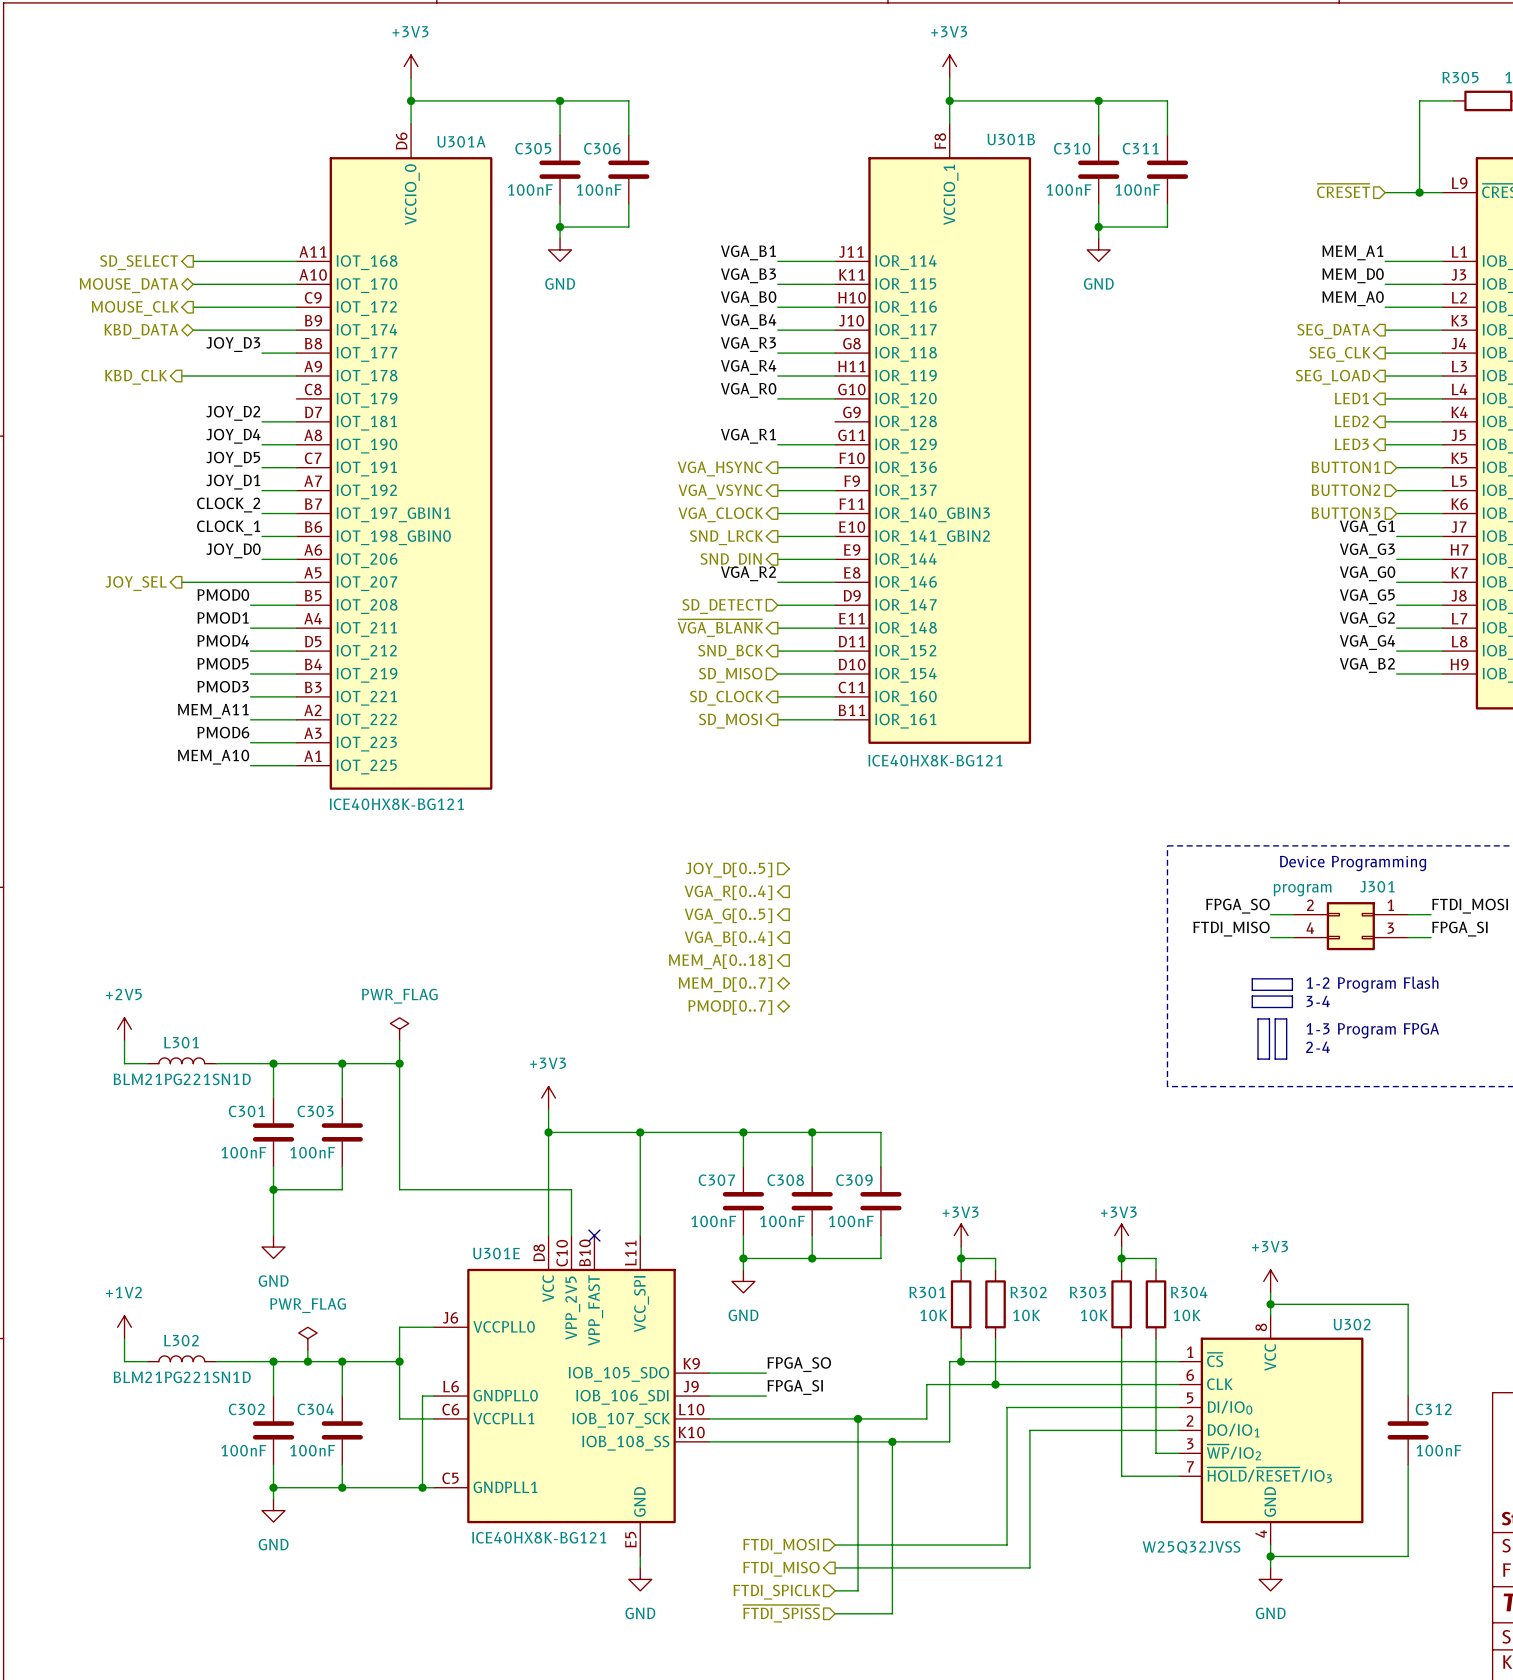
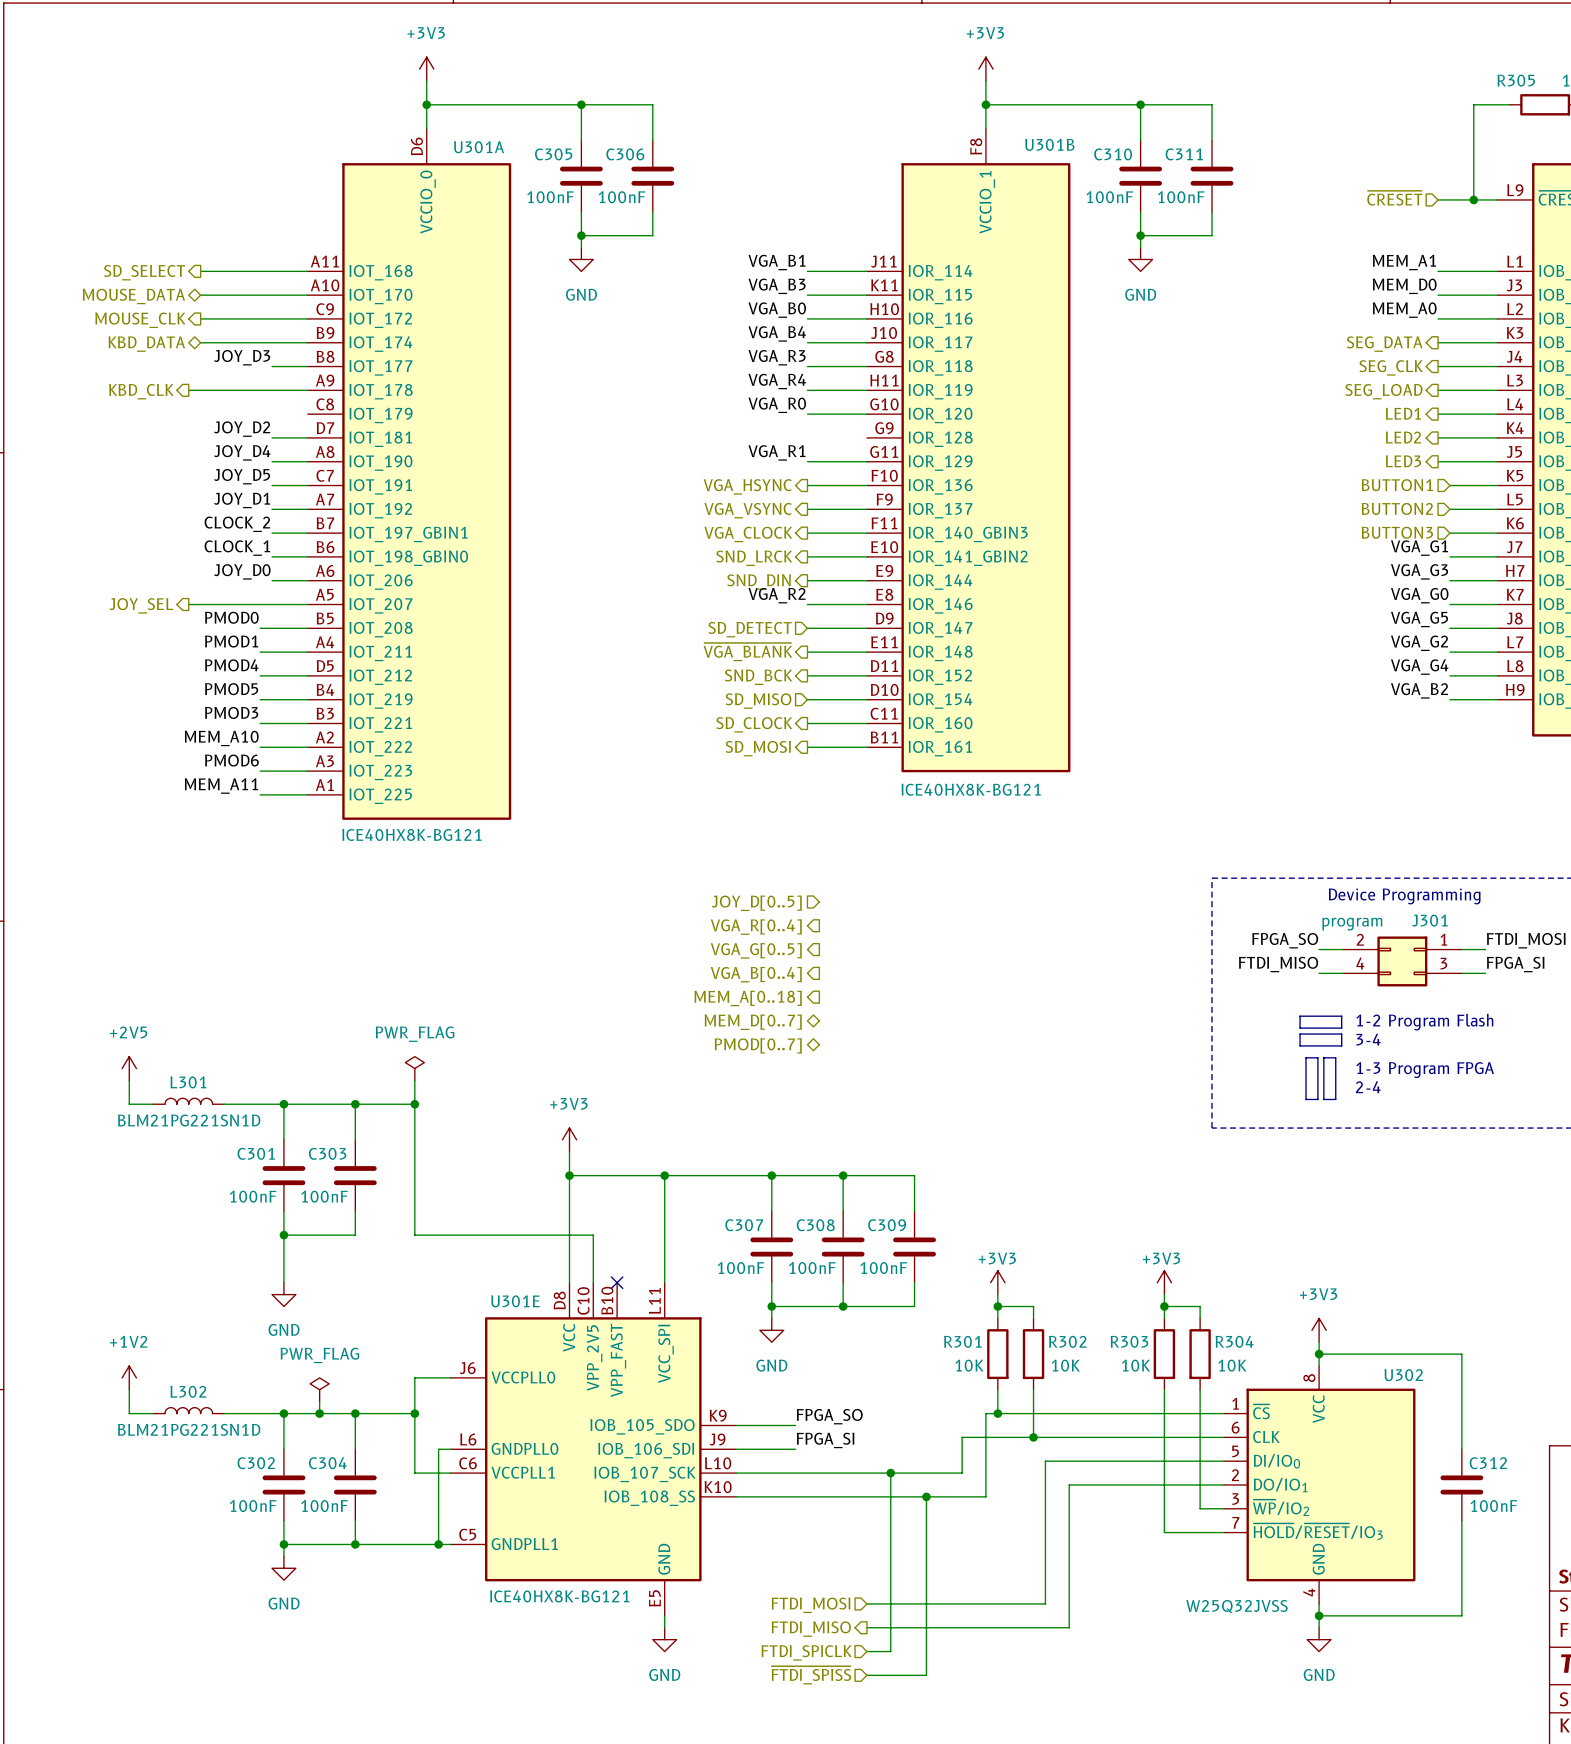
label: MEM_A11 (213, 711) -> MEM_A10 (221, 738)
label: MEM_A10 (213, 757) -> MEM_A11 (221, 786)

